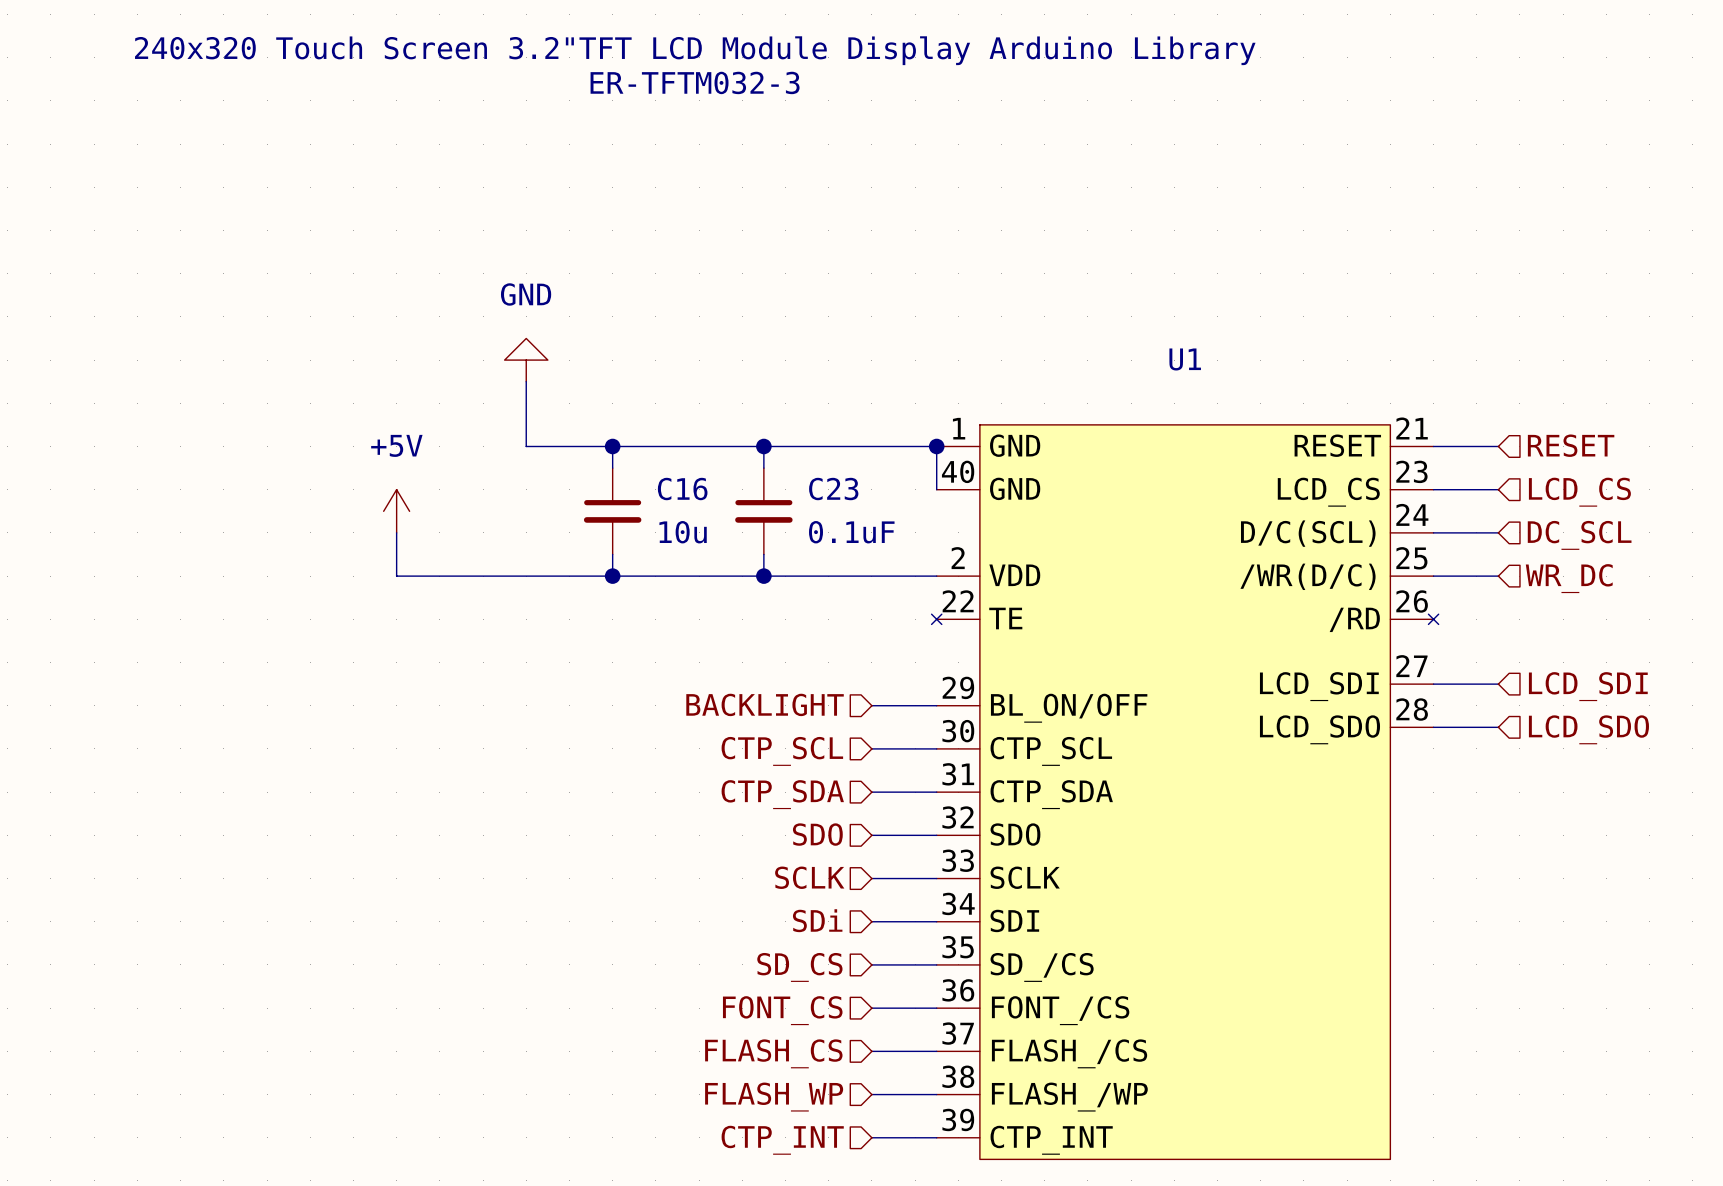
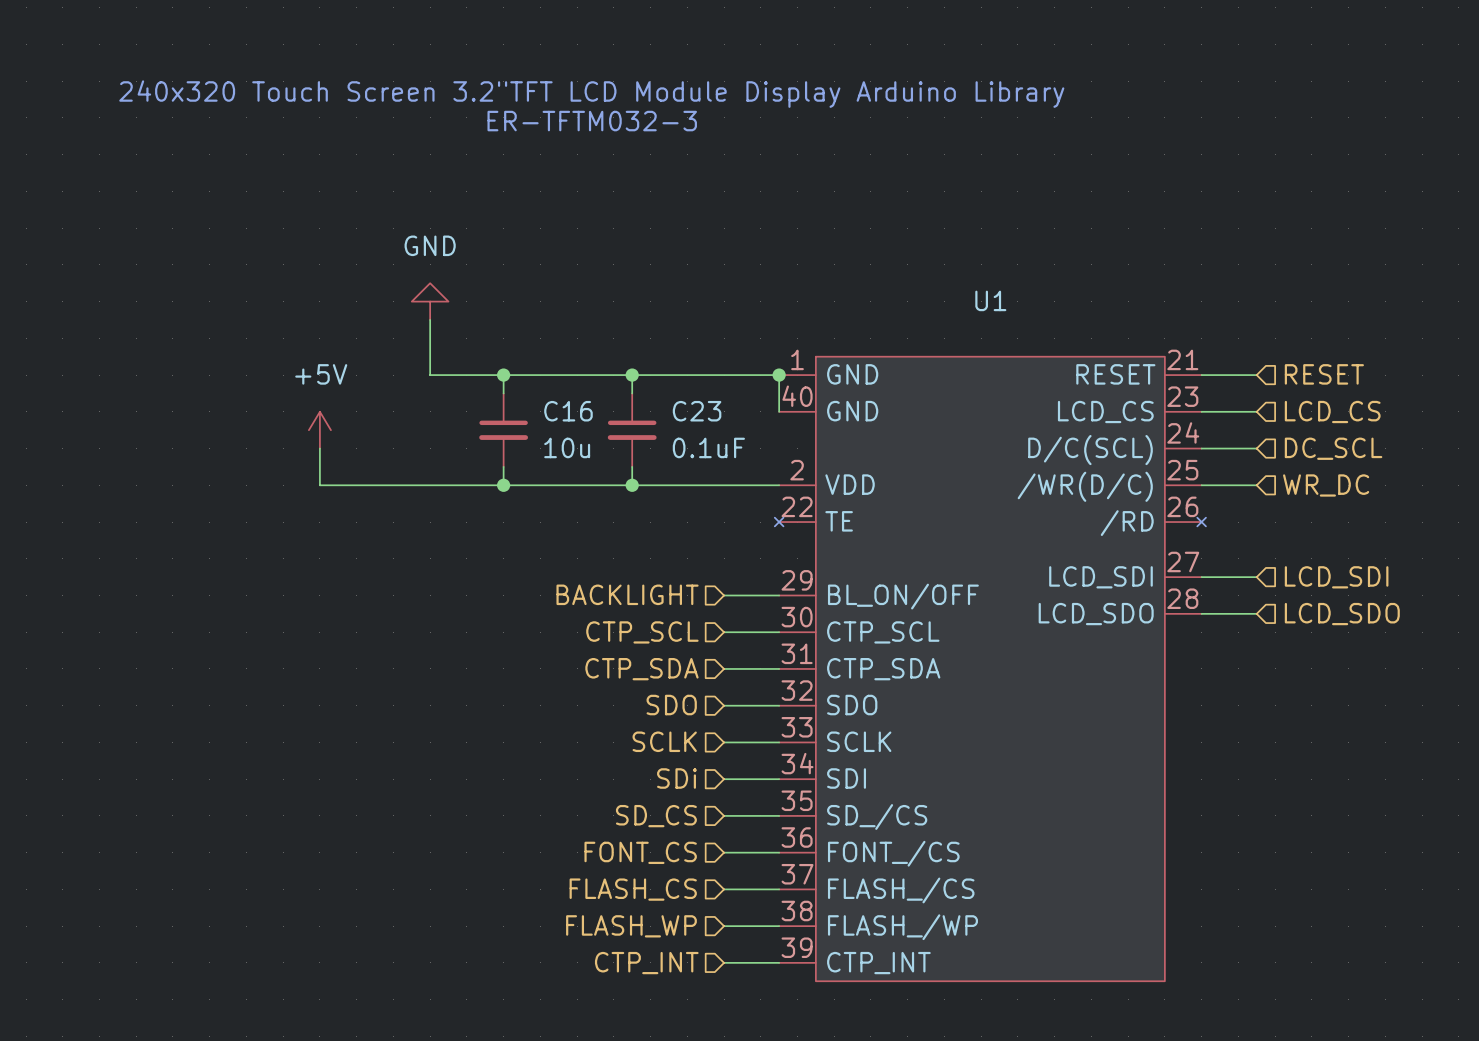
text position: 240x320 Touch Screen 3.2"TFT LCD Module Display Arduino Library (695, 50) -> 240x320 Touch Screen 3.2"TFT LCD Module Display Arduino Library (591, 94)
text position: ER-TFTM032-3 (695, 82) -> ER-TFTM032-3 (592, 121)

